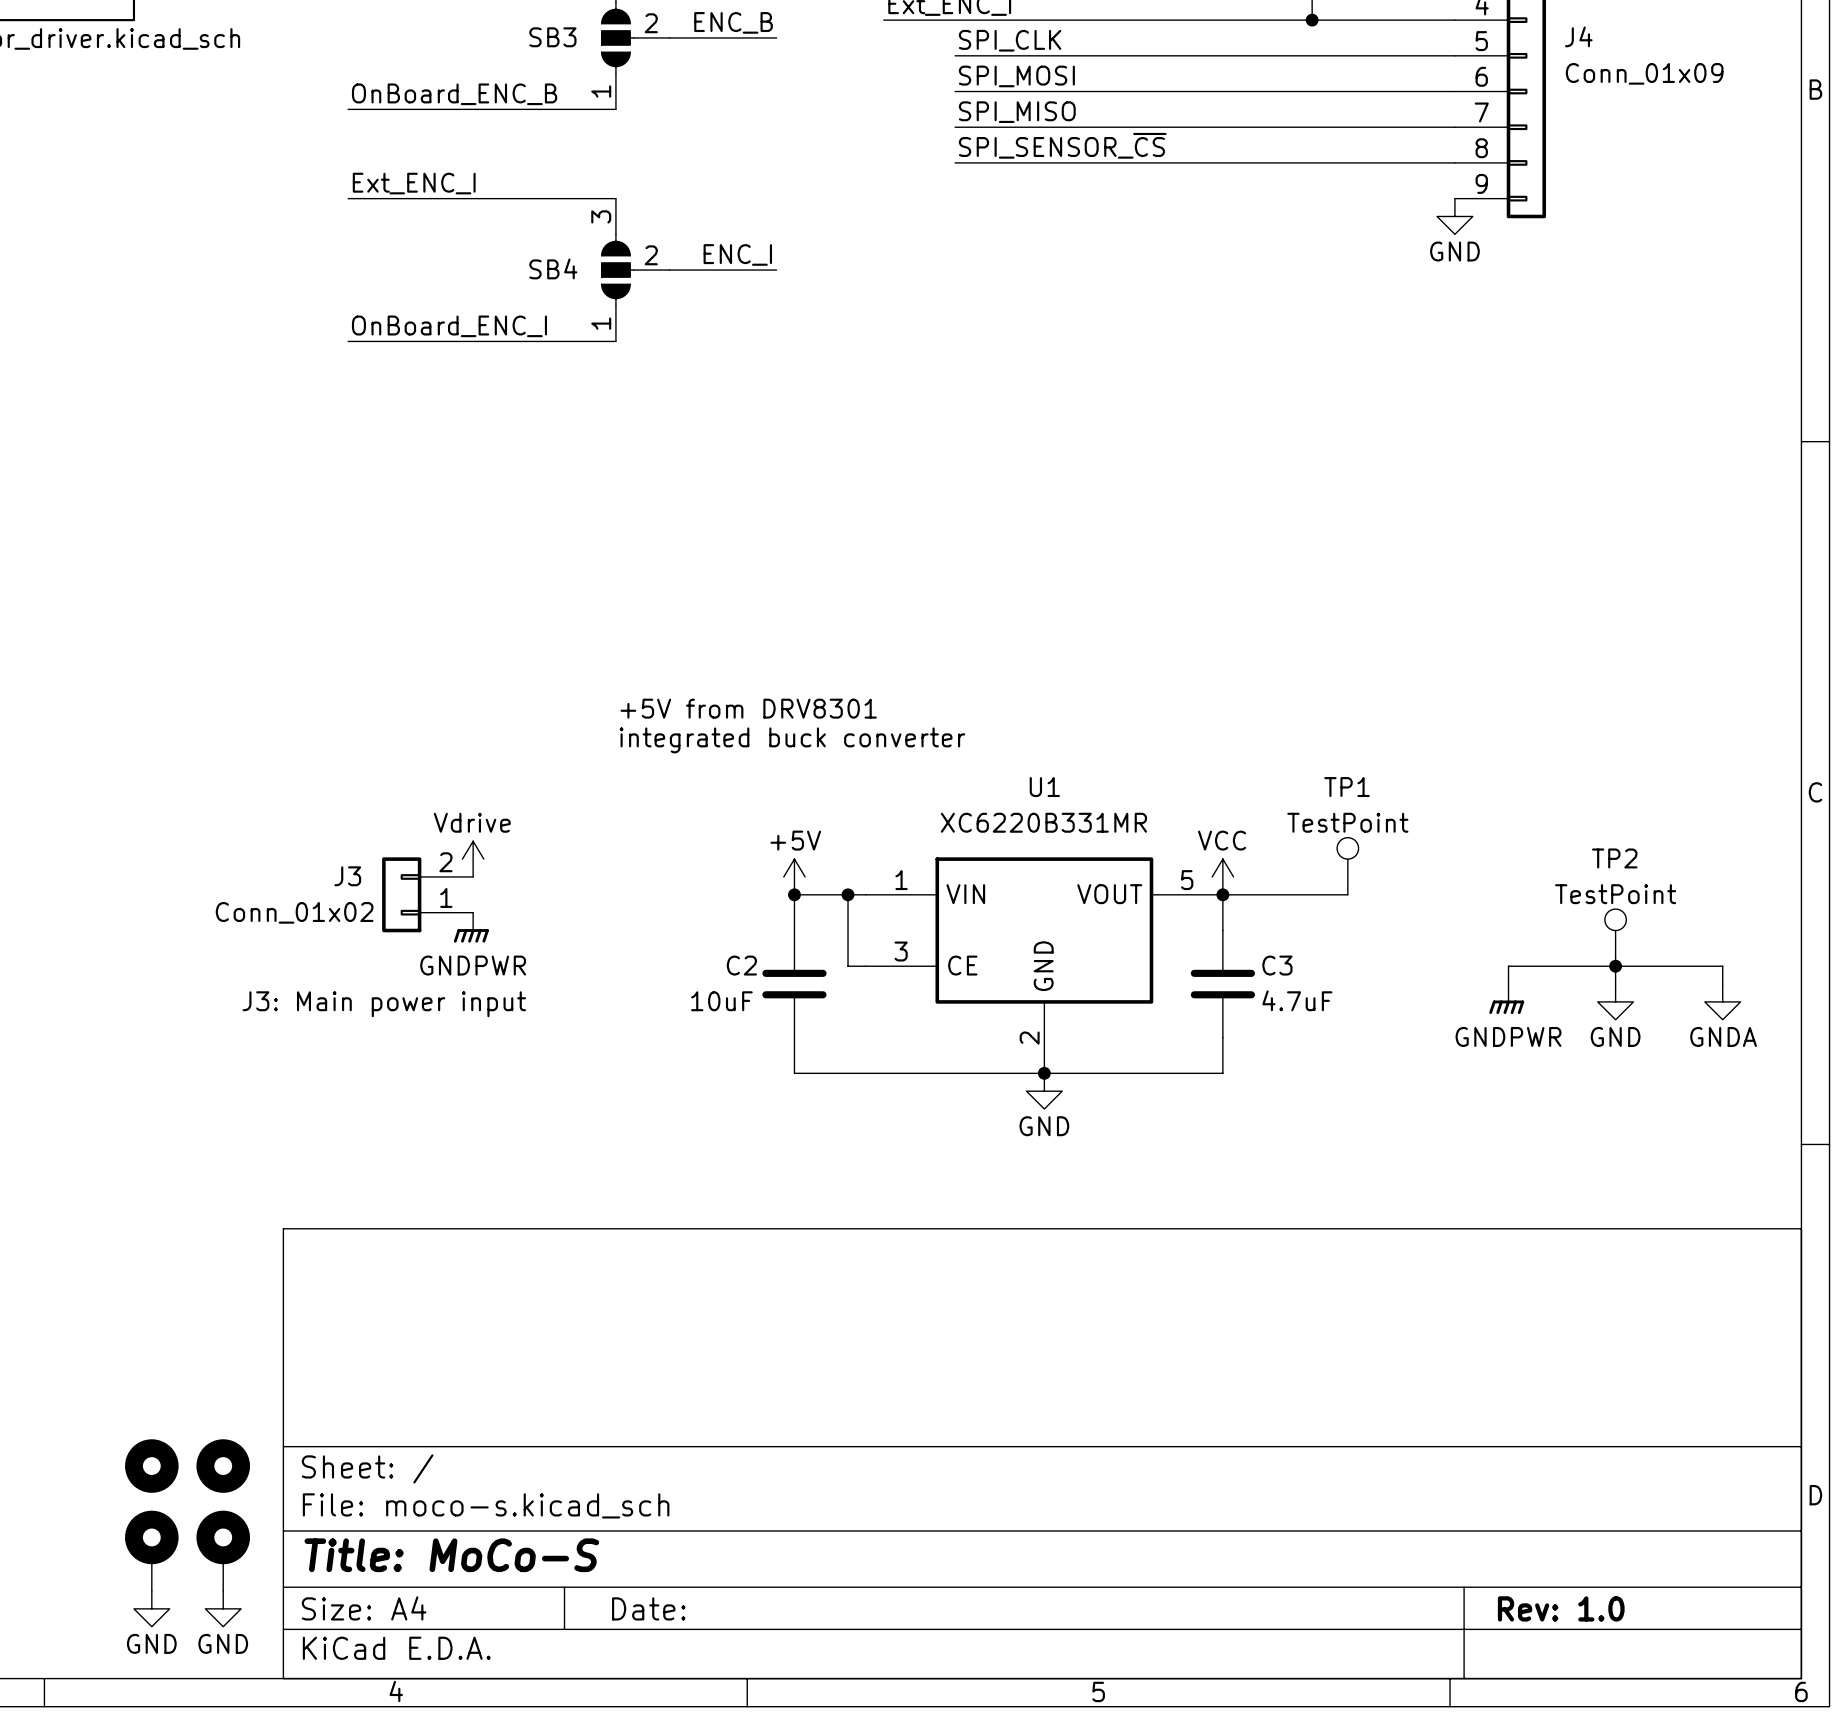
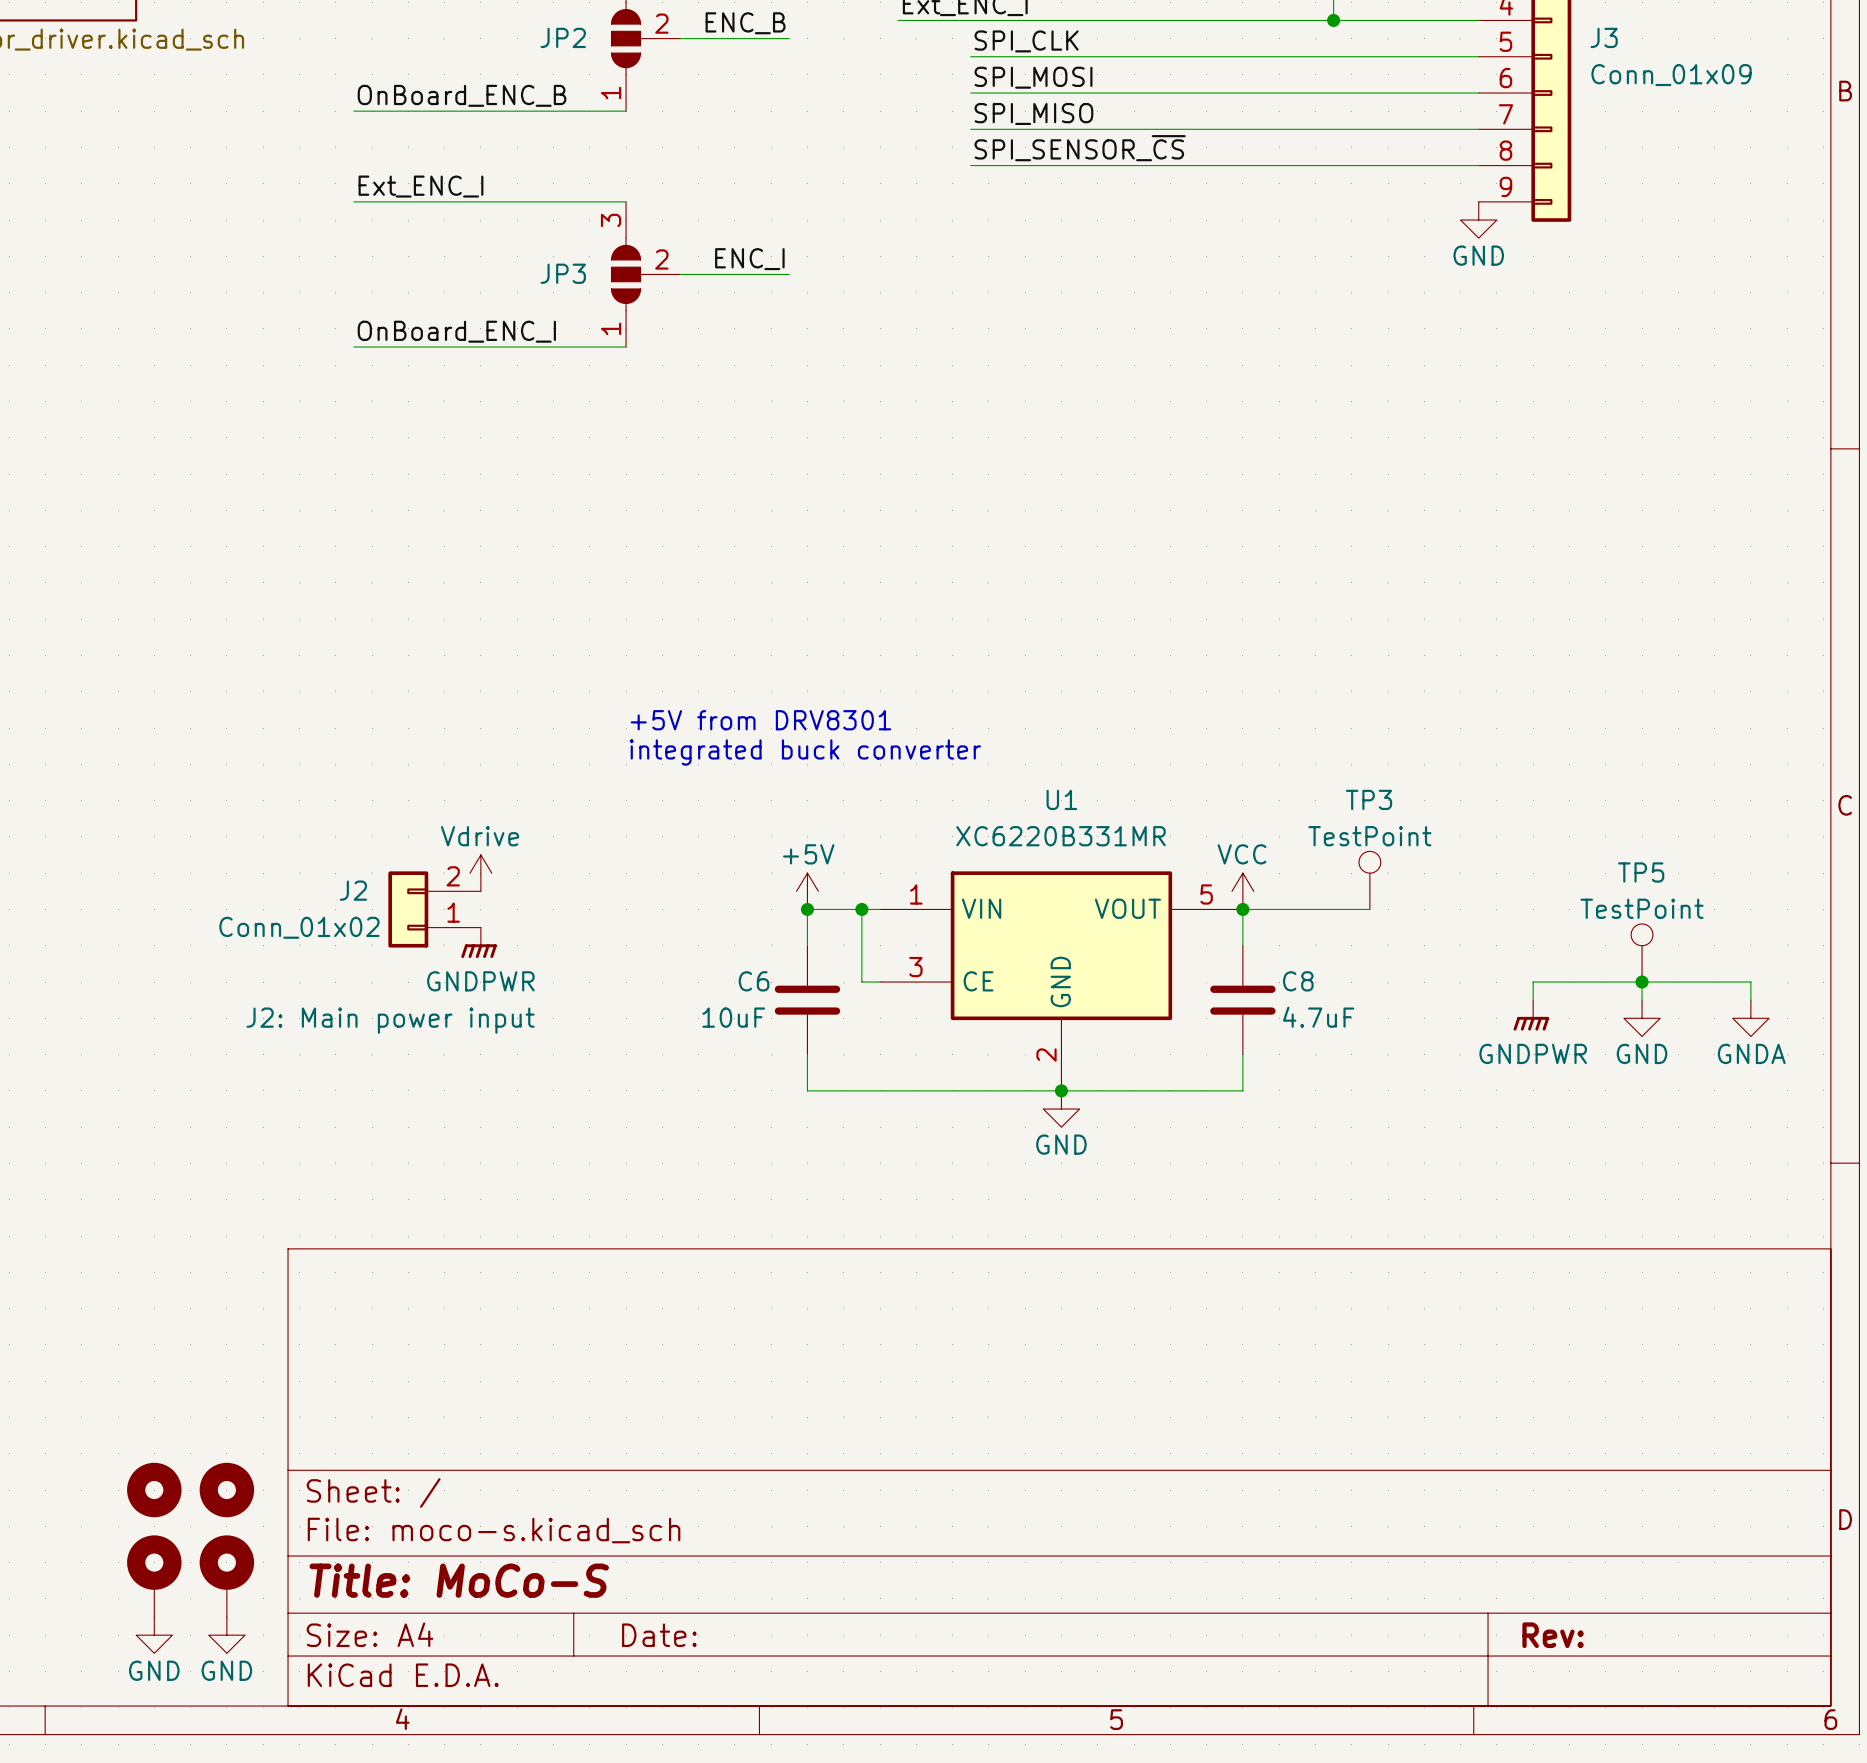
J4 name: J4 (1578, 36) -> J3 (1604, 37)
SB3 name: SB3 (552, 37) -> JP2 (563, 37)
SB4 name: SB4 (553, 268) -> JP3 (563, 273)
TP1 name: TP1 (1346, 787) -> TP3 (1369, 799)
TP2 name: TP2 (1614, 858) -> TP5 (1641, 872)
J3 name: J3 (347, 876) -> J2 (353, 890)
C2 name: C2 (741, 965) -> C6 (754, 981)
C3 name: C3 (1277, 965) -> C8 (1298, 981)
J3 text: J3: Main power input (384, 1004) -> J2: Main power input (390, 1020)
title block: Rev: 1.0 (1561, 1608) -> Rev: (1553, 1635)

